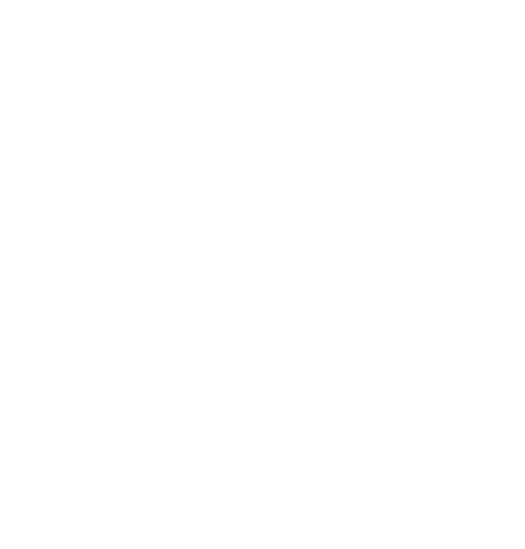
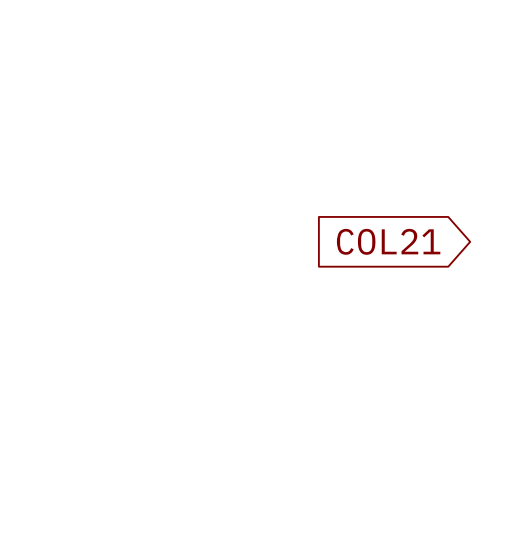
global label: none -> COL21 (388, 241)

